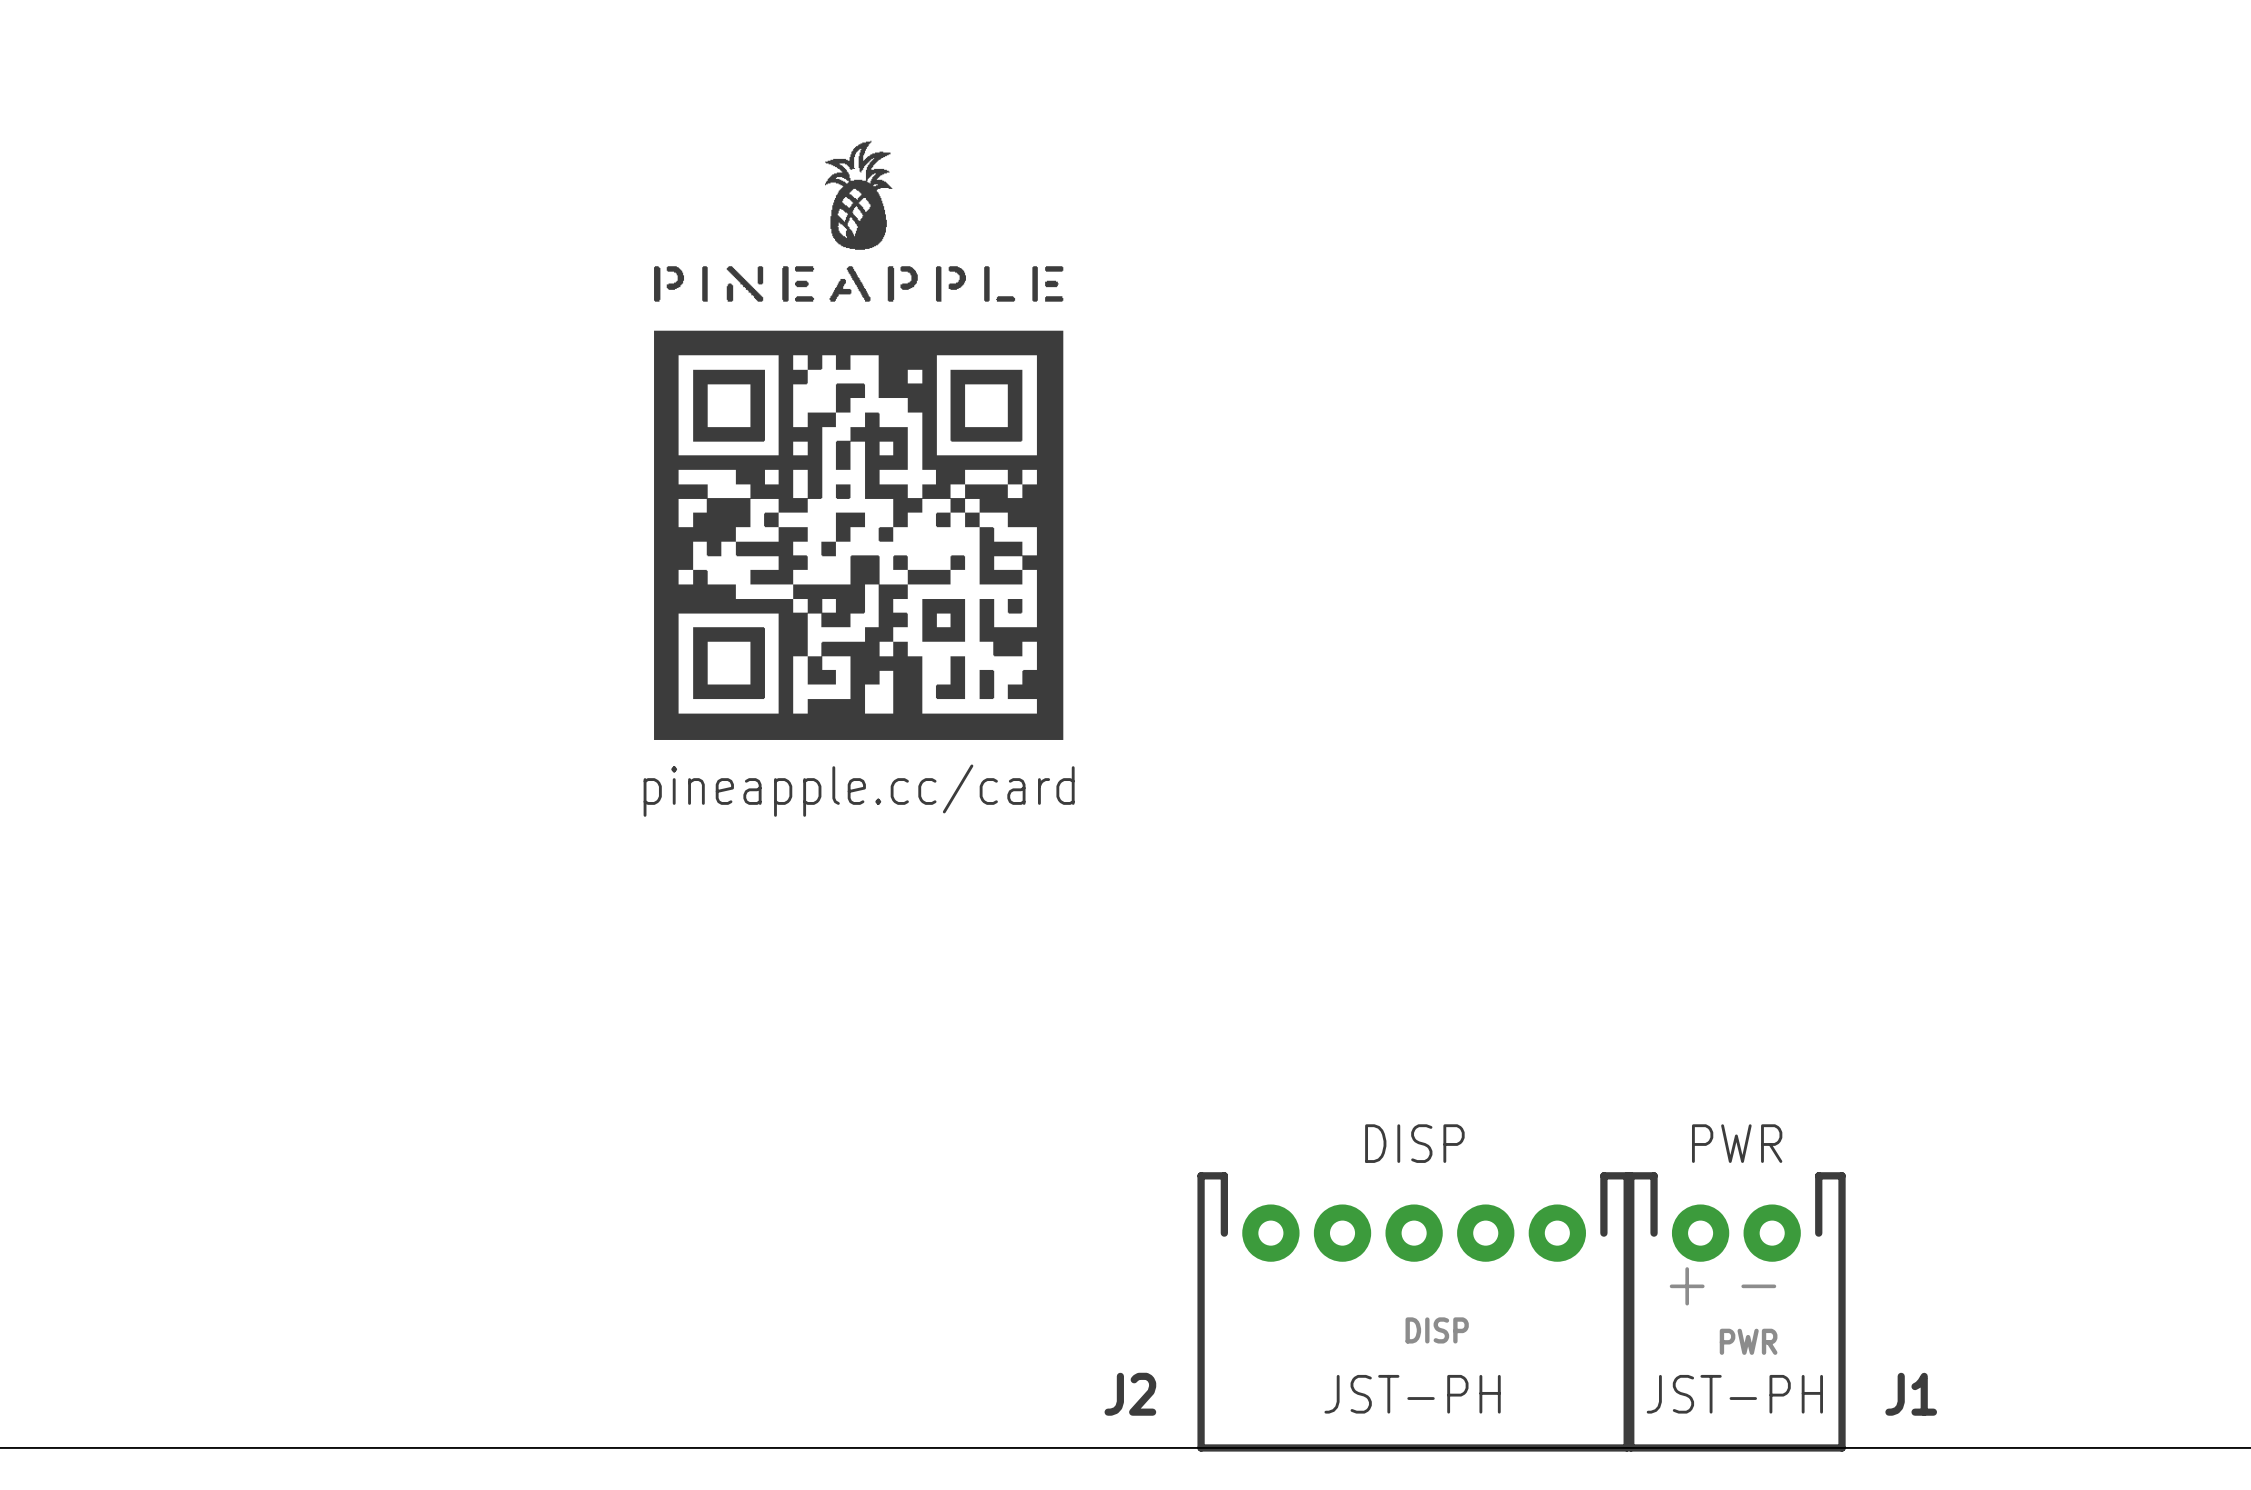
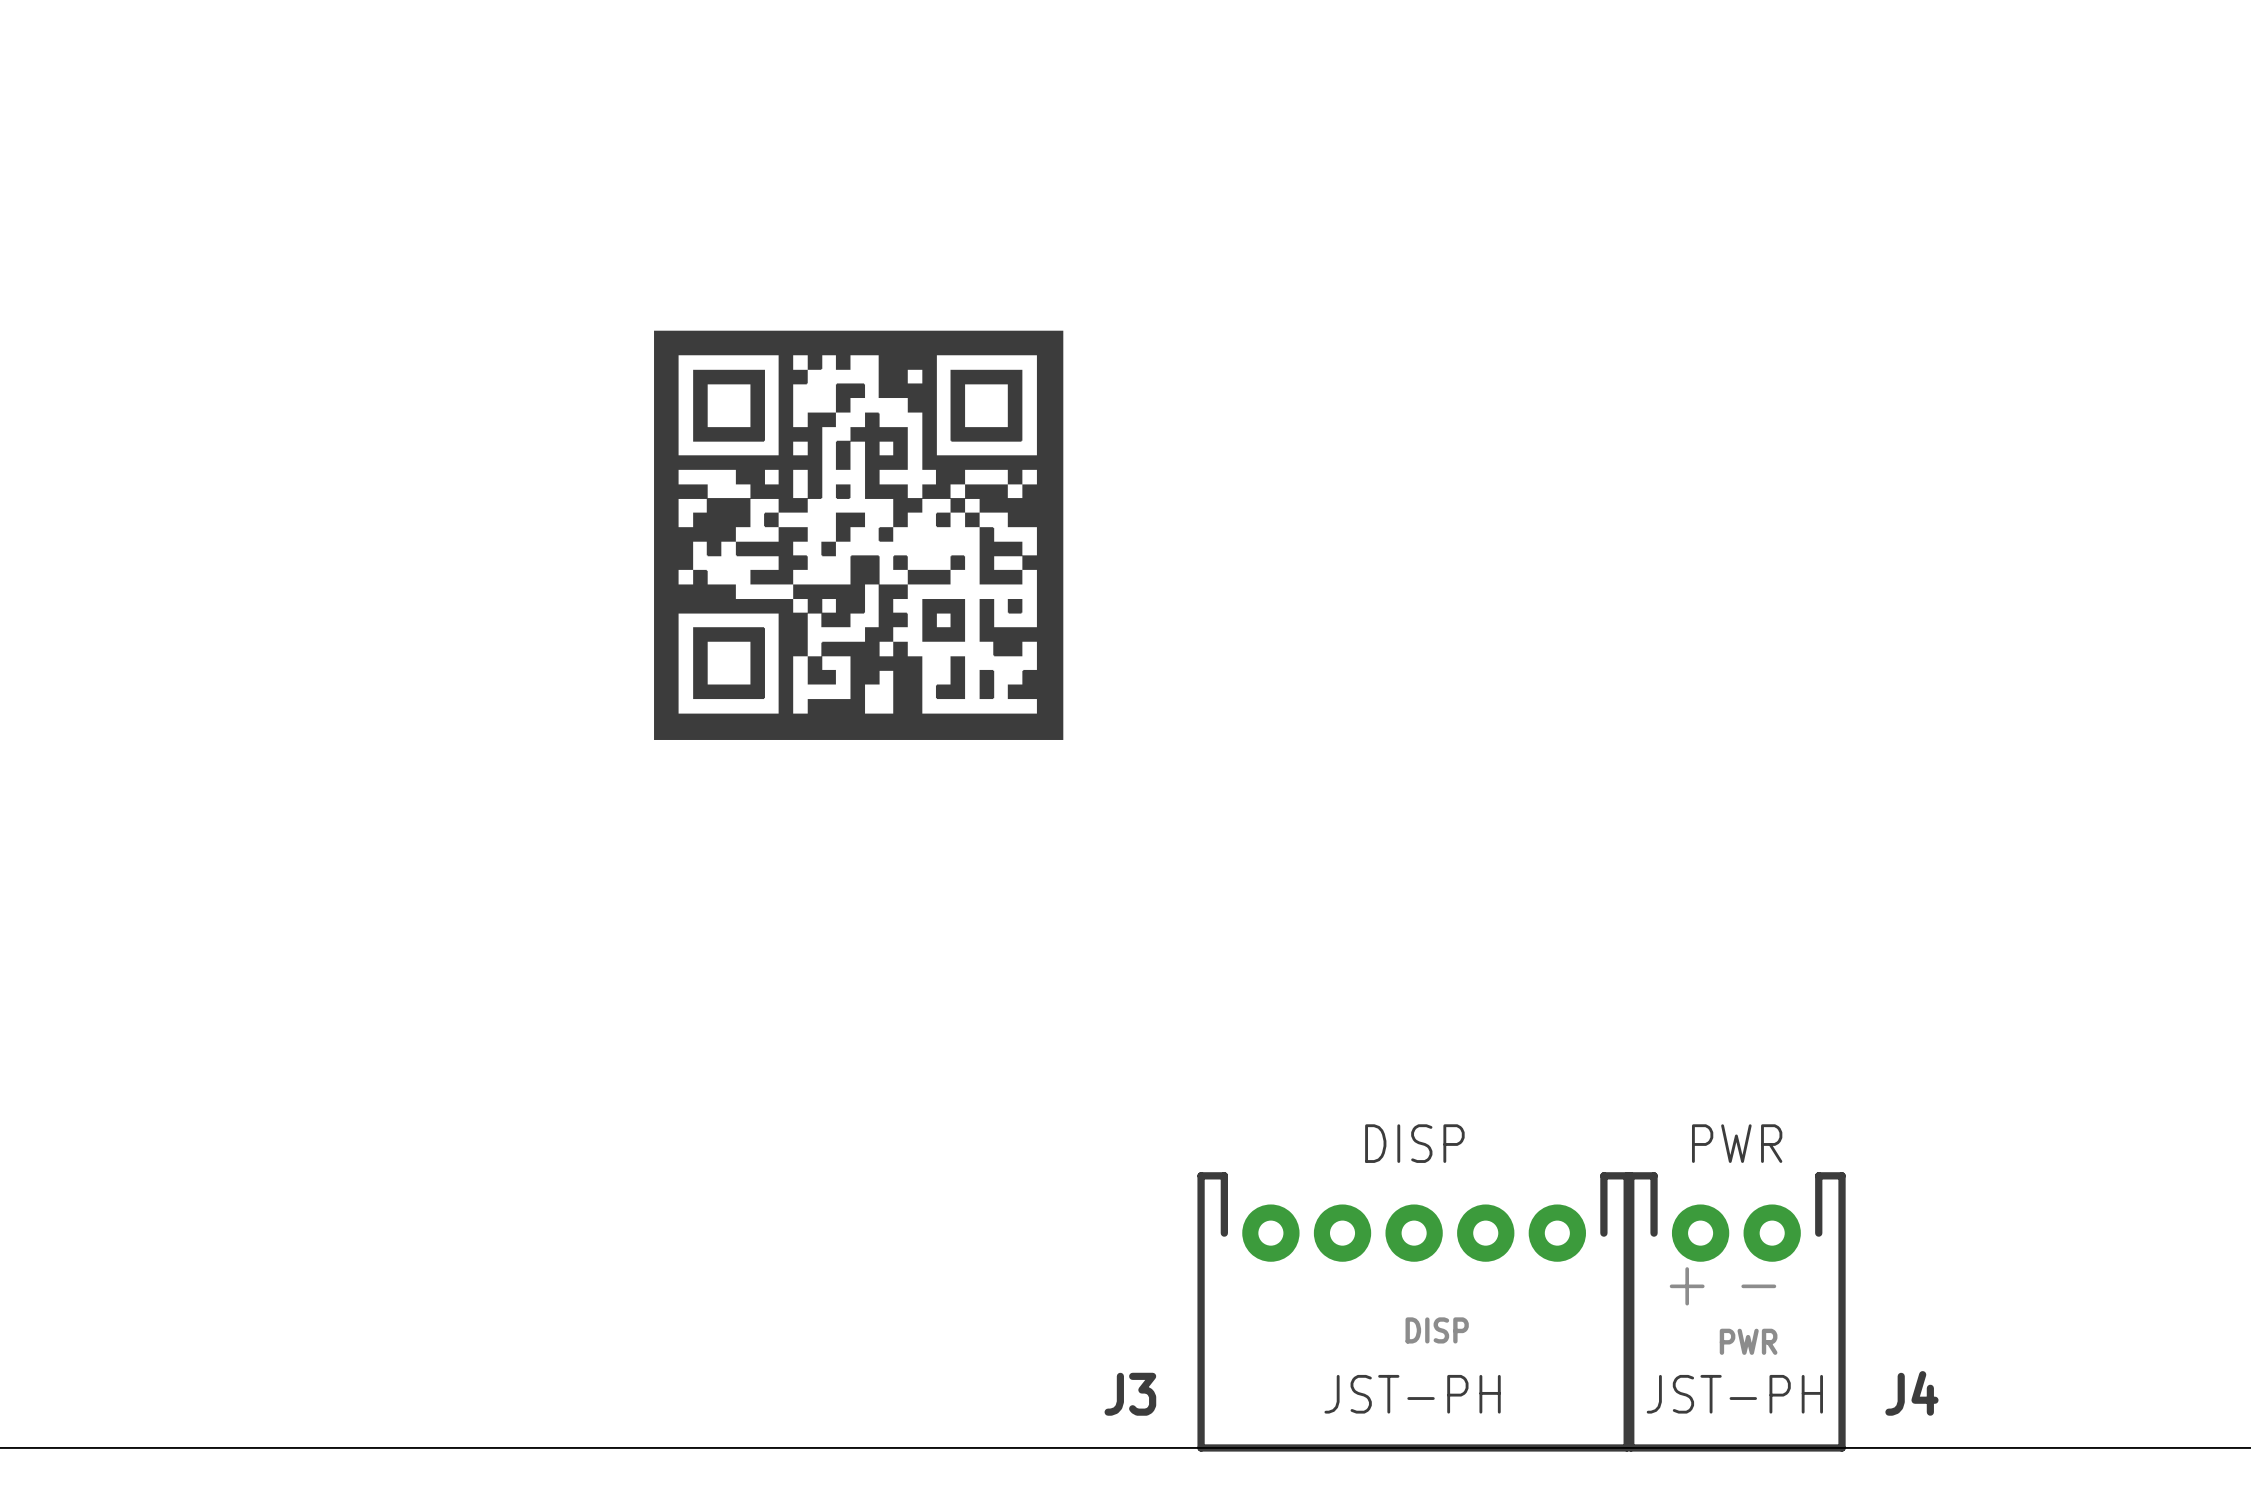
drawing: [654, 140, 1064, 302] -> none
text: pineapple.cc/card (859, 790) -> none
J2 name: J2 (1130, 1394) -> J3 (1130, 1394)
J1 name: J1 (1911, 1394) -> J4 (1911, 1393)

